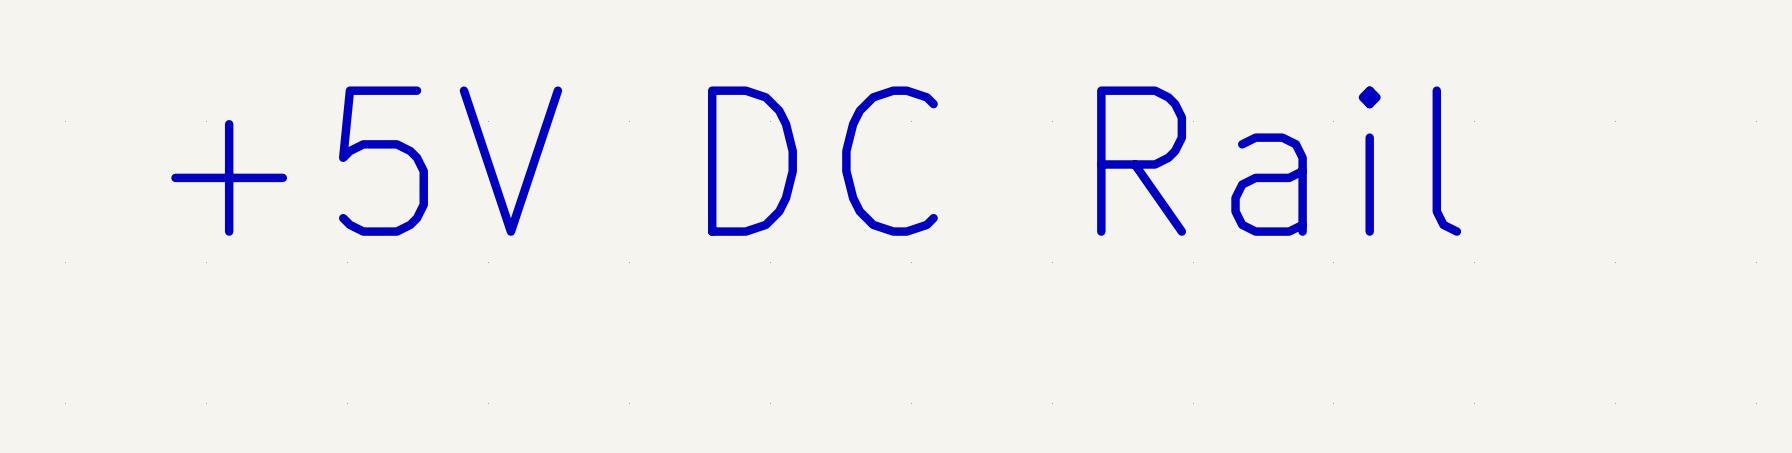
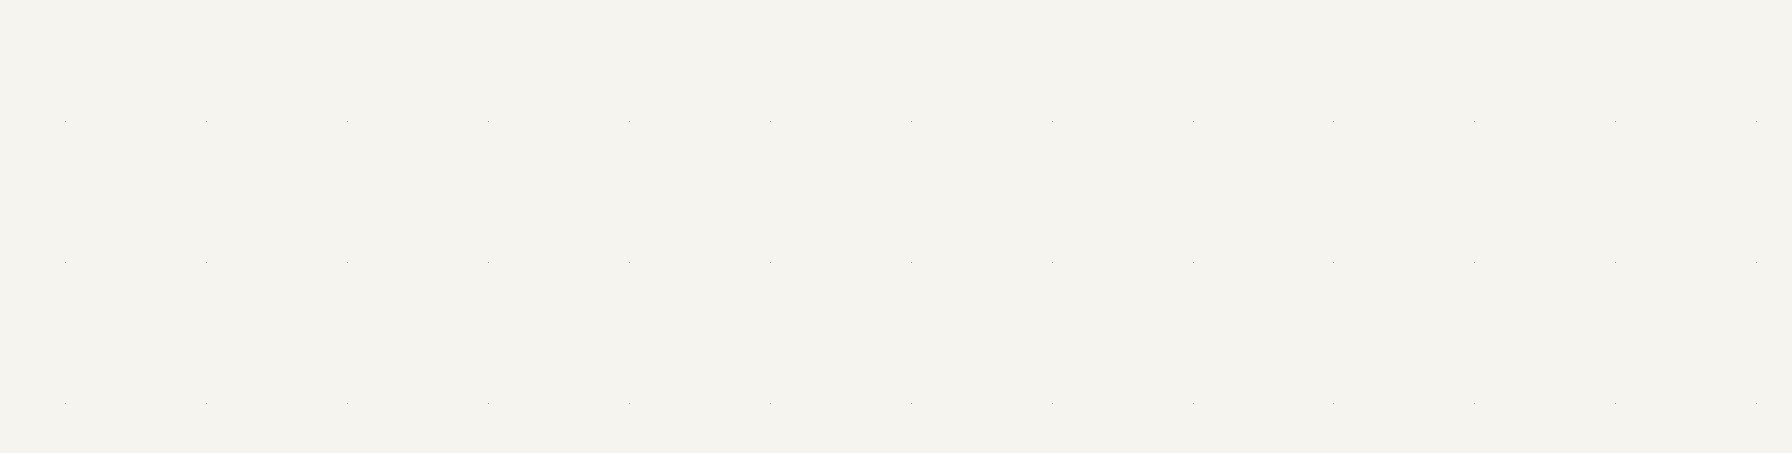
text: +5V DC Rail (816, 161) -> none

